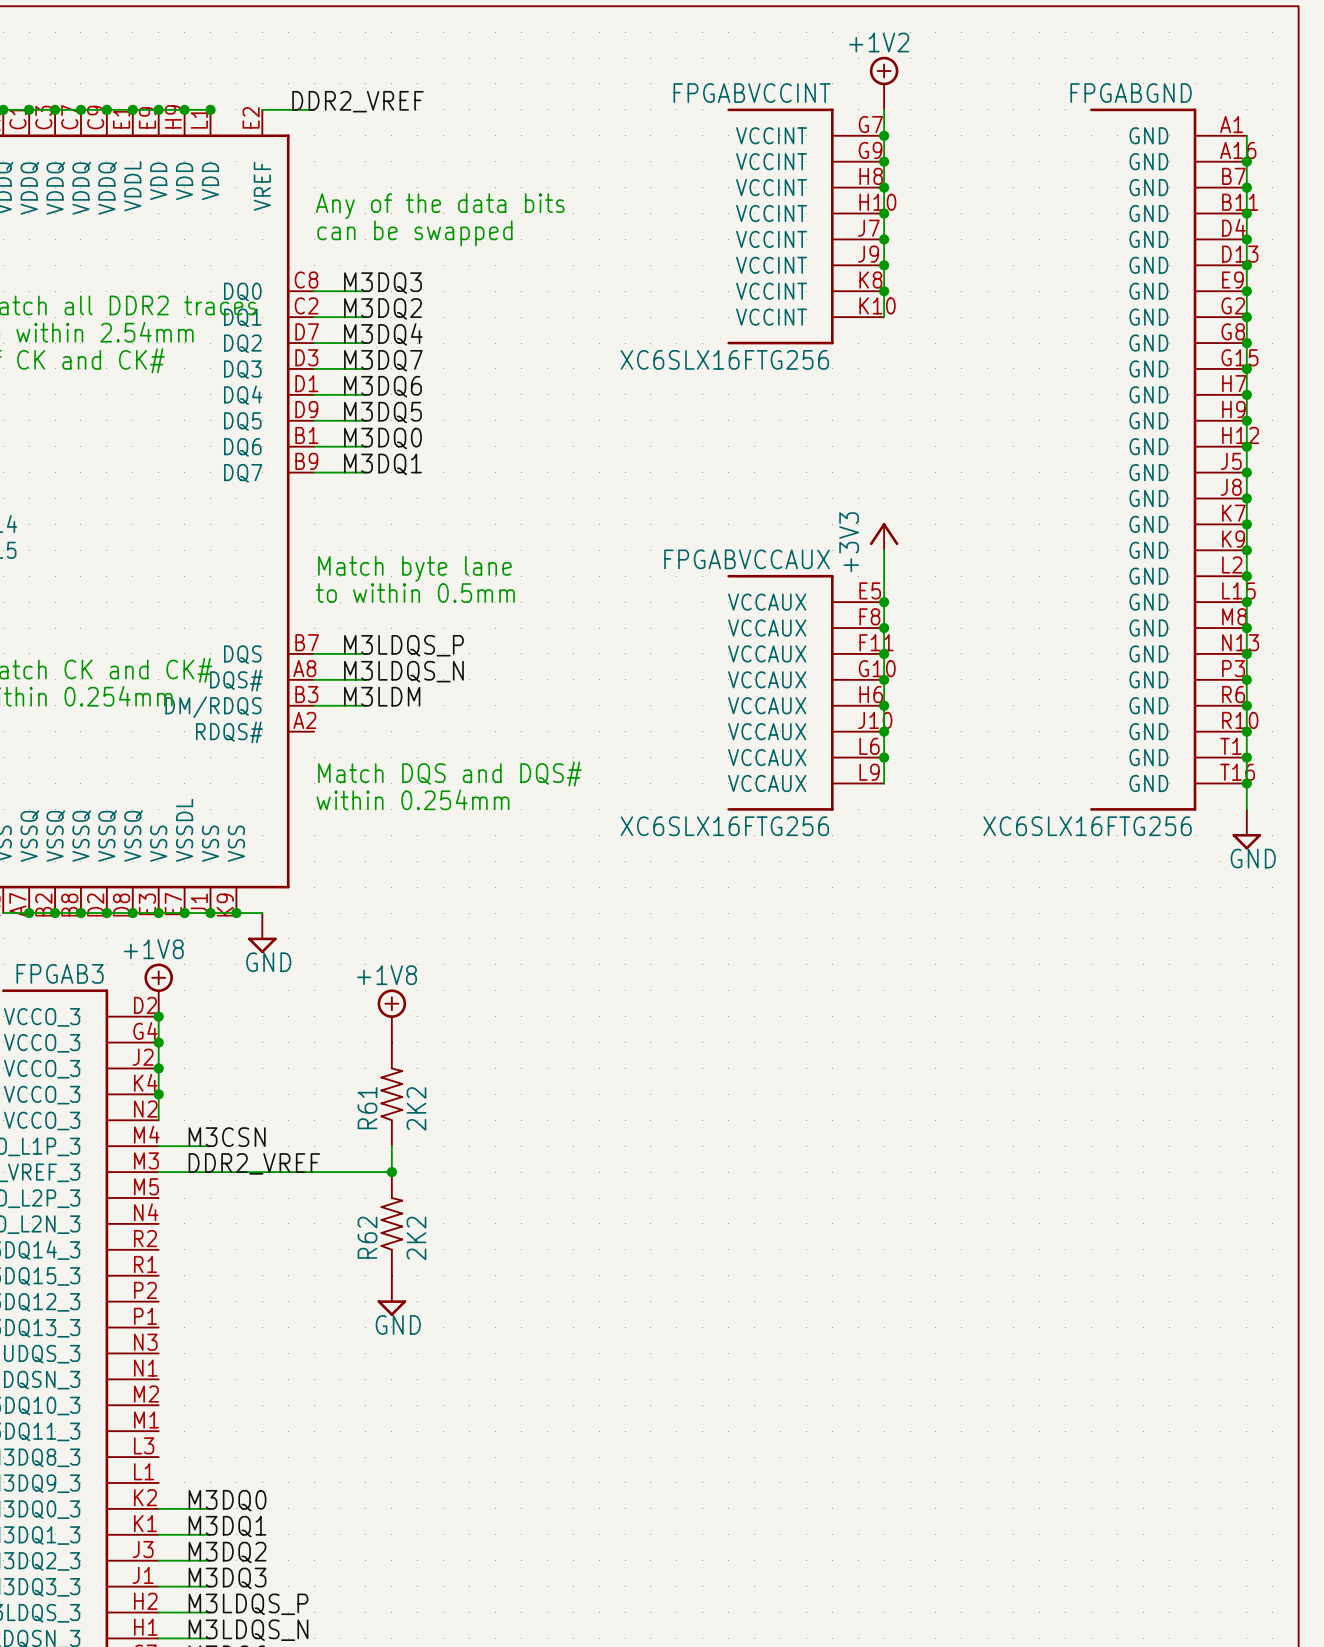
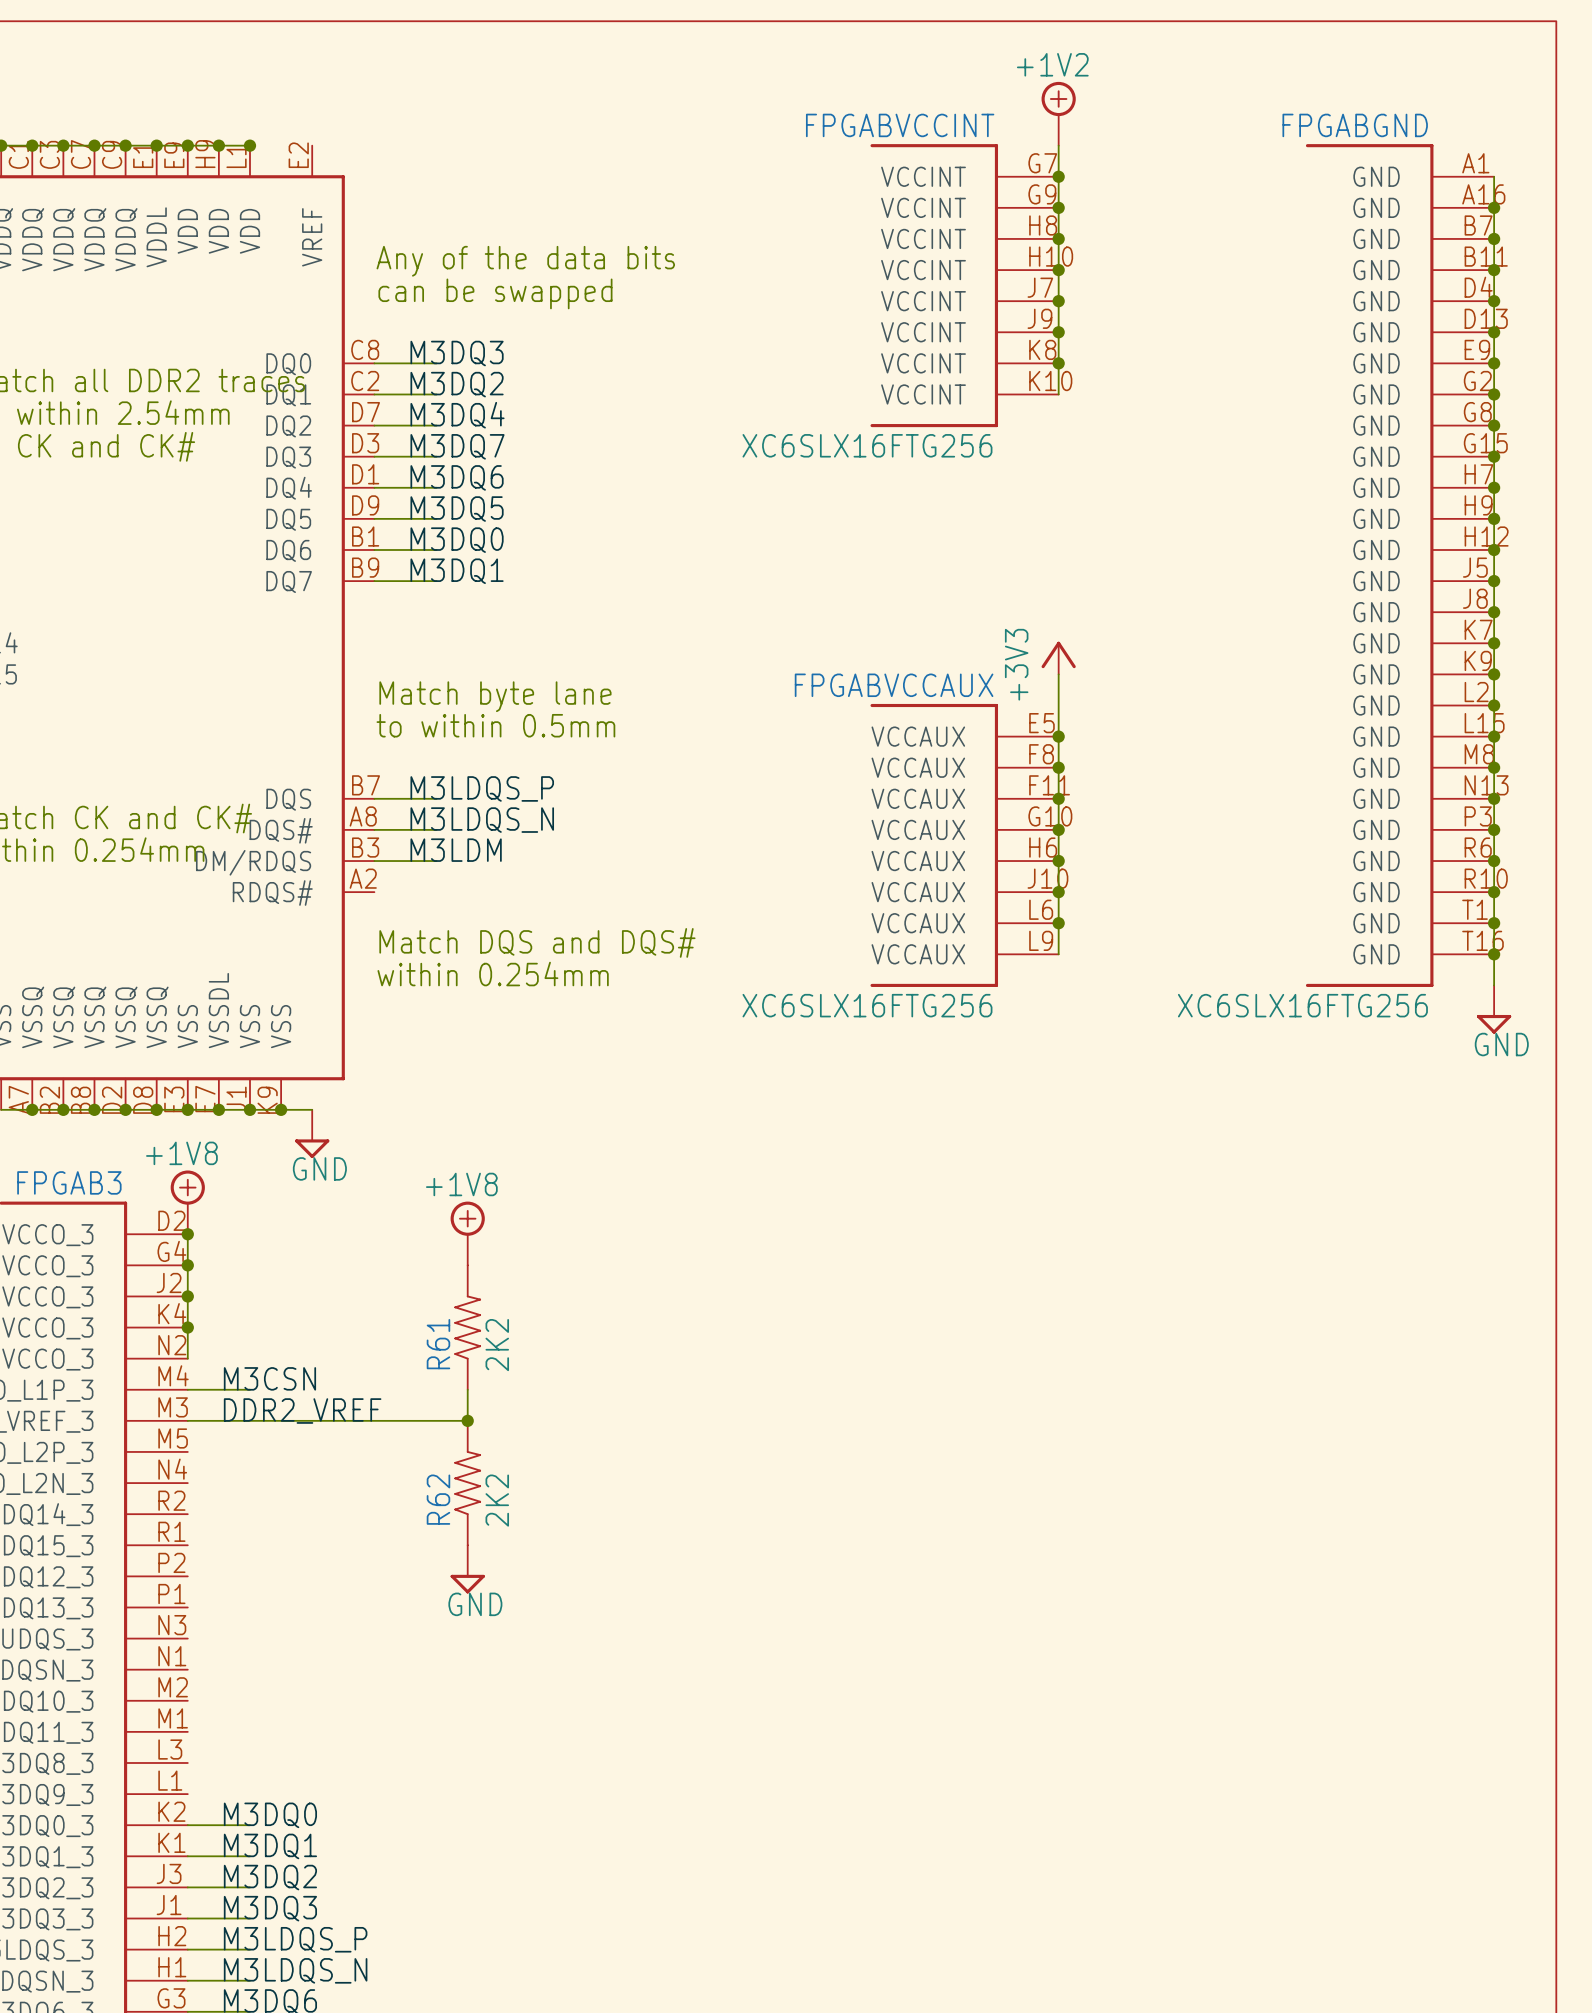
label: DDR2_VREF (357, 101) -> none
wire: (262, 109) (314, 109) -> none

